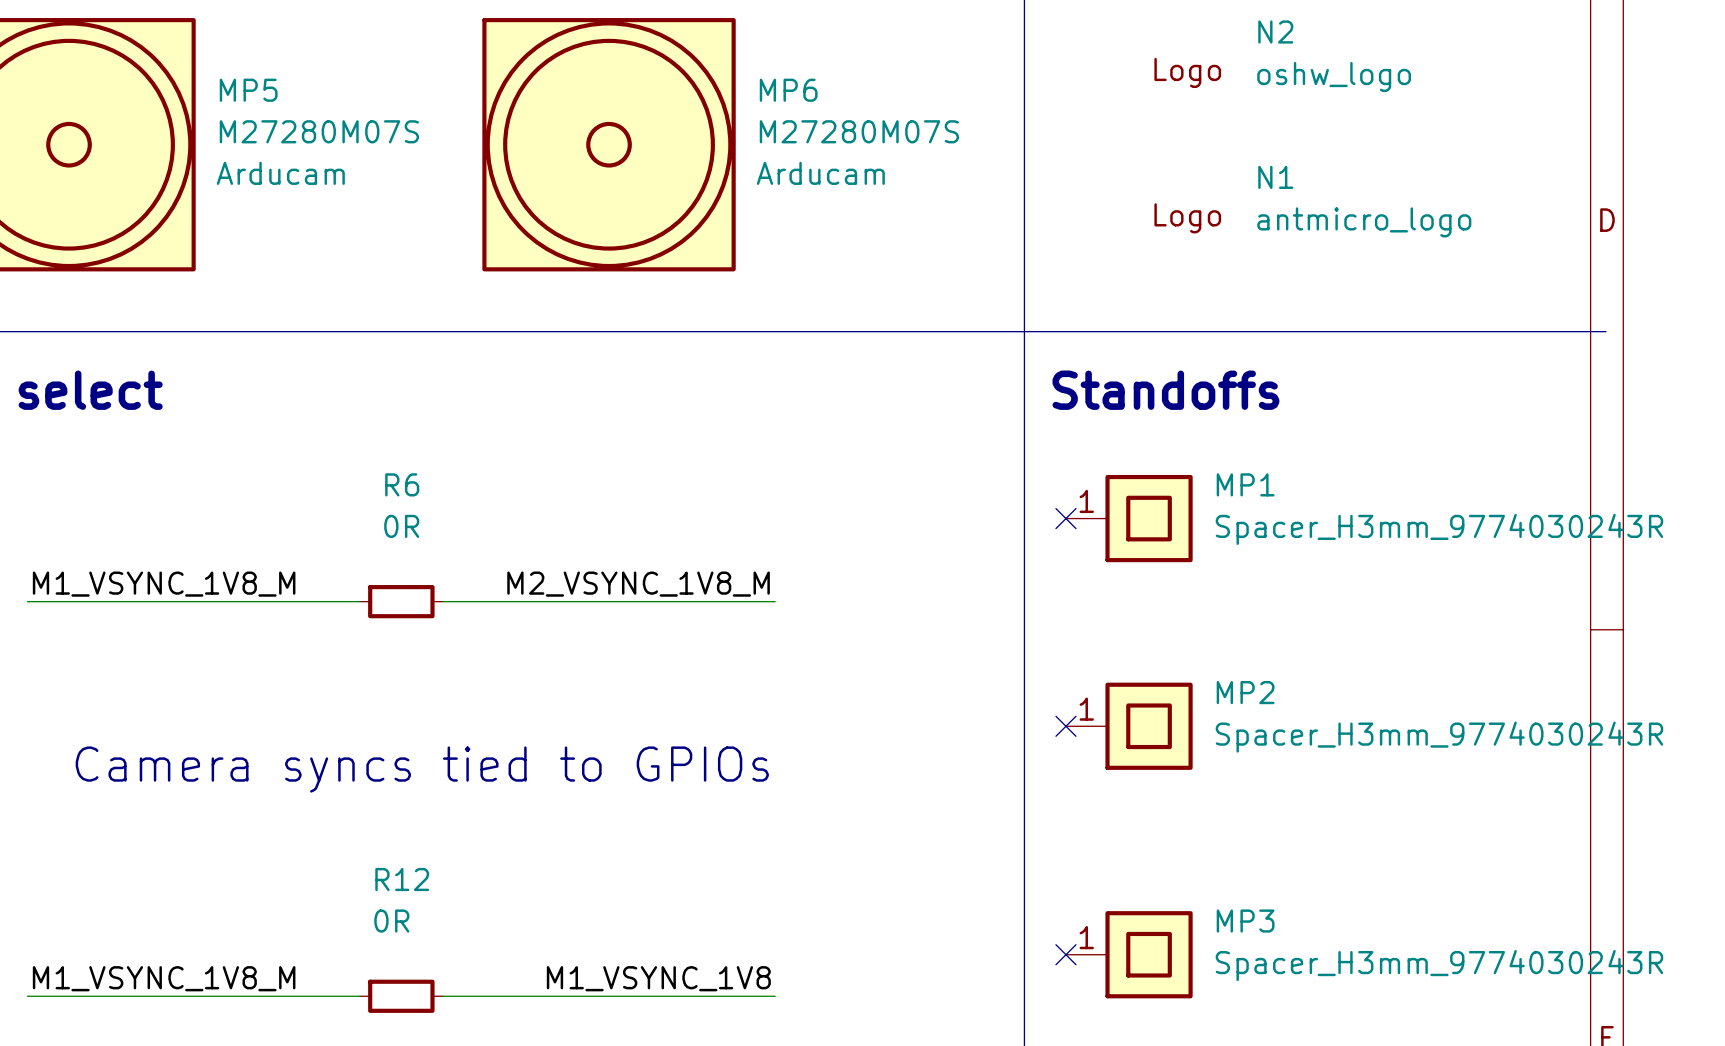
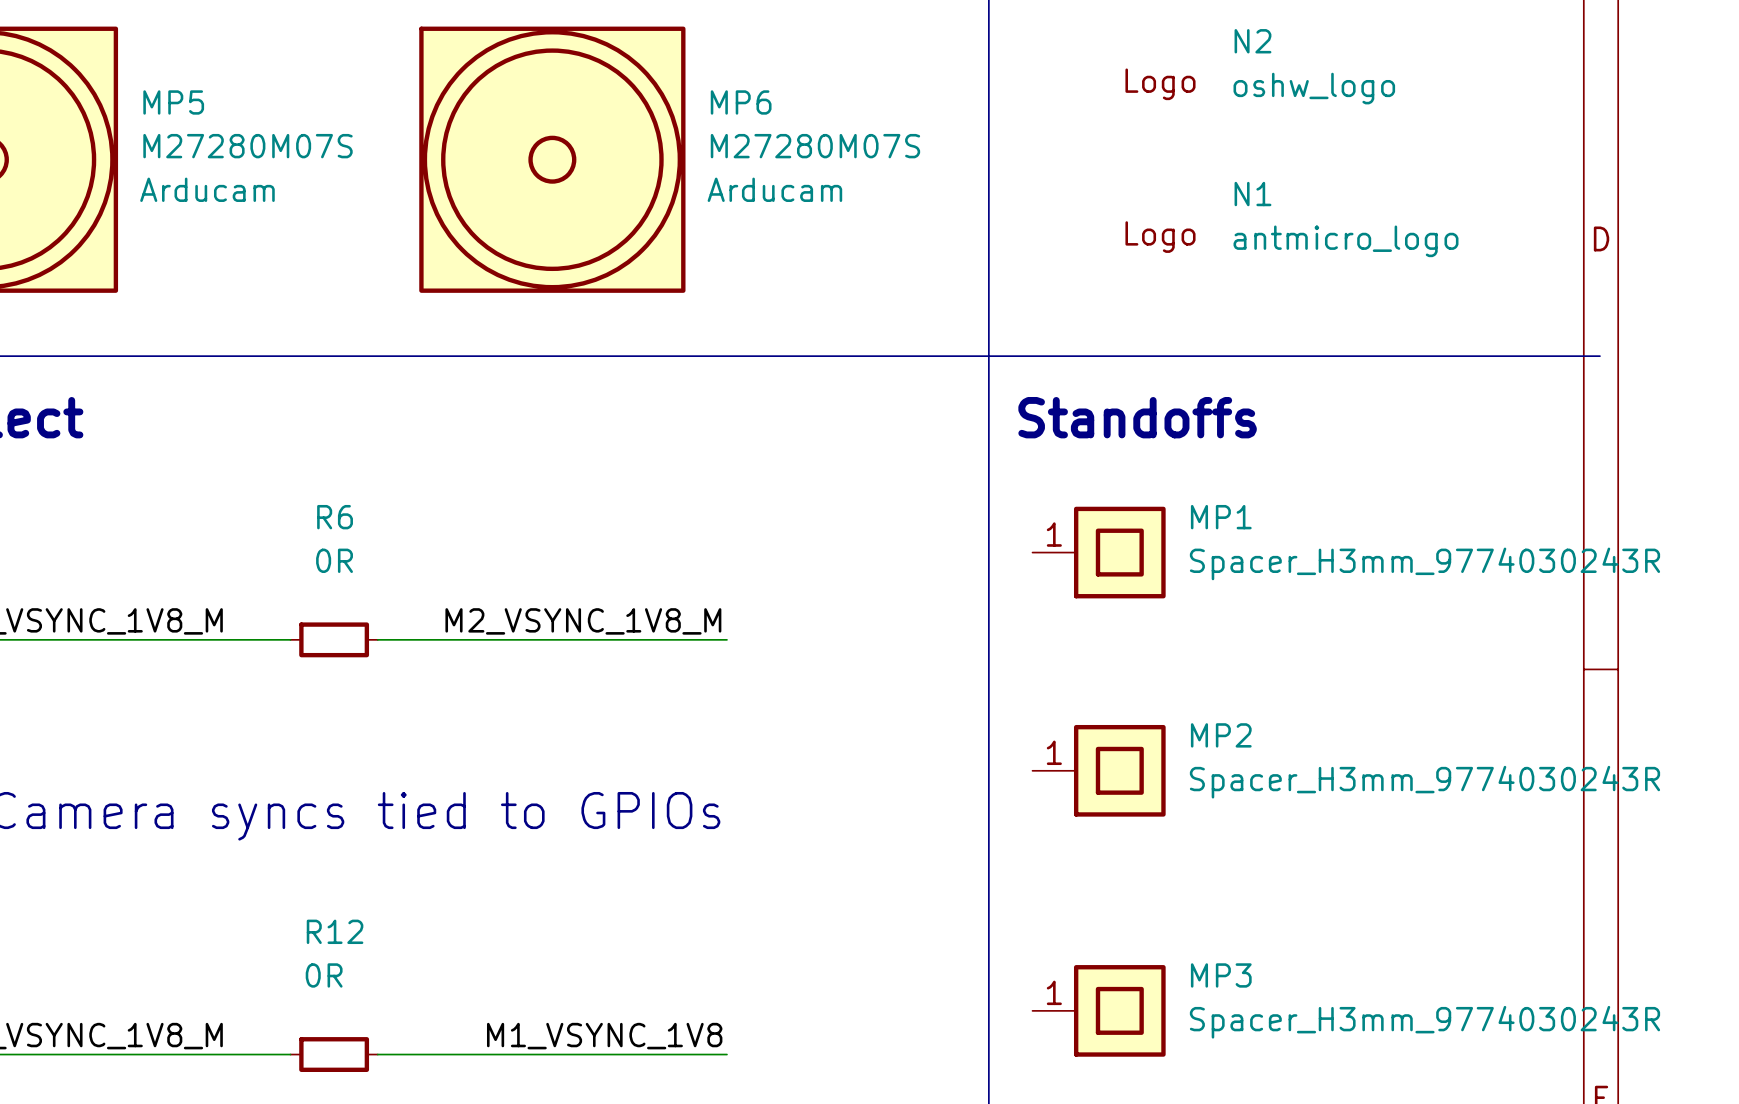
no-connect mark: (1065, 518) -> none
no-connect mark: (1065, 726) -> none
no-connect mark: (1065, 954) -> none

